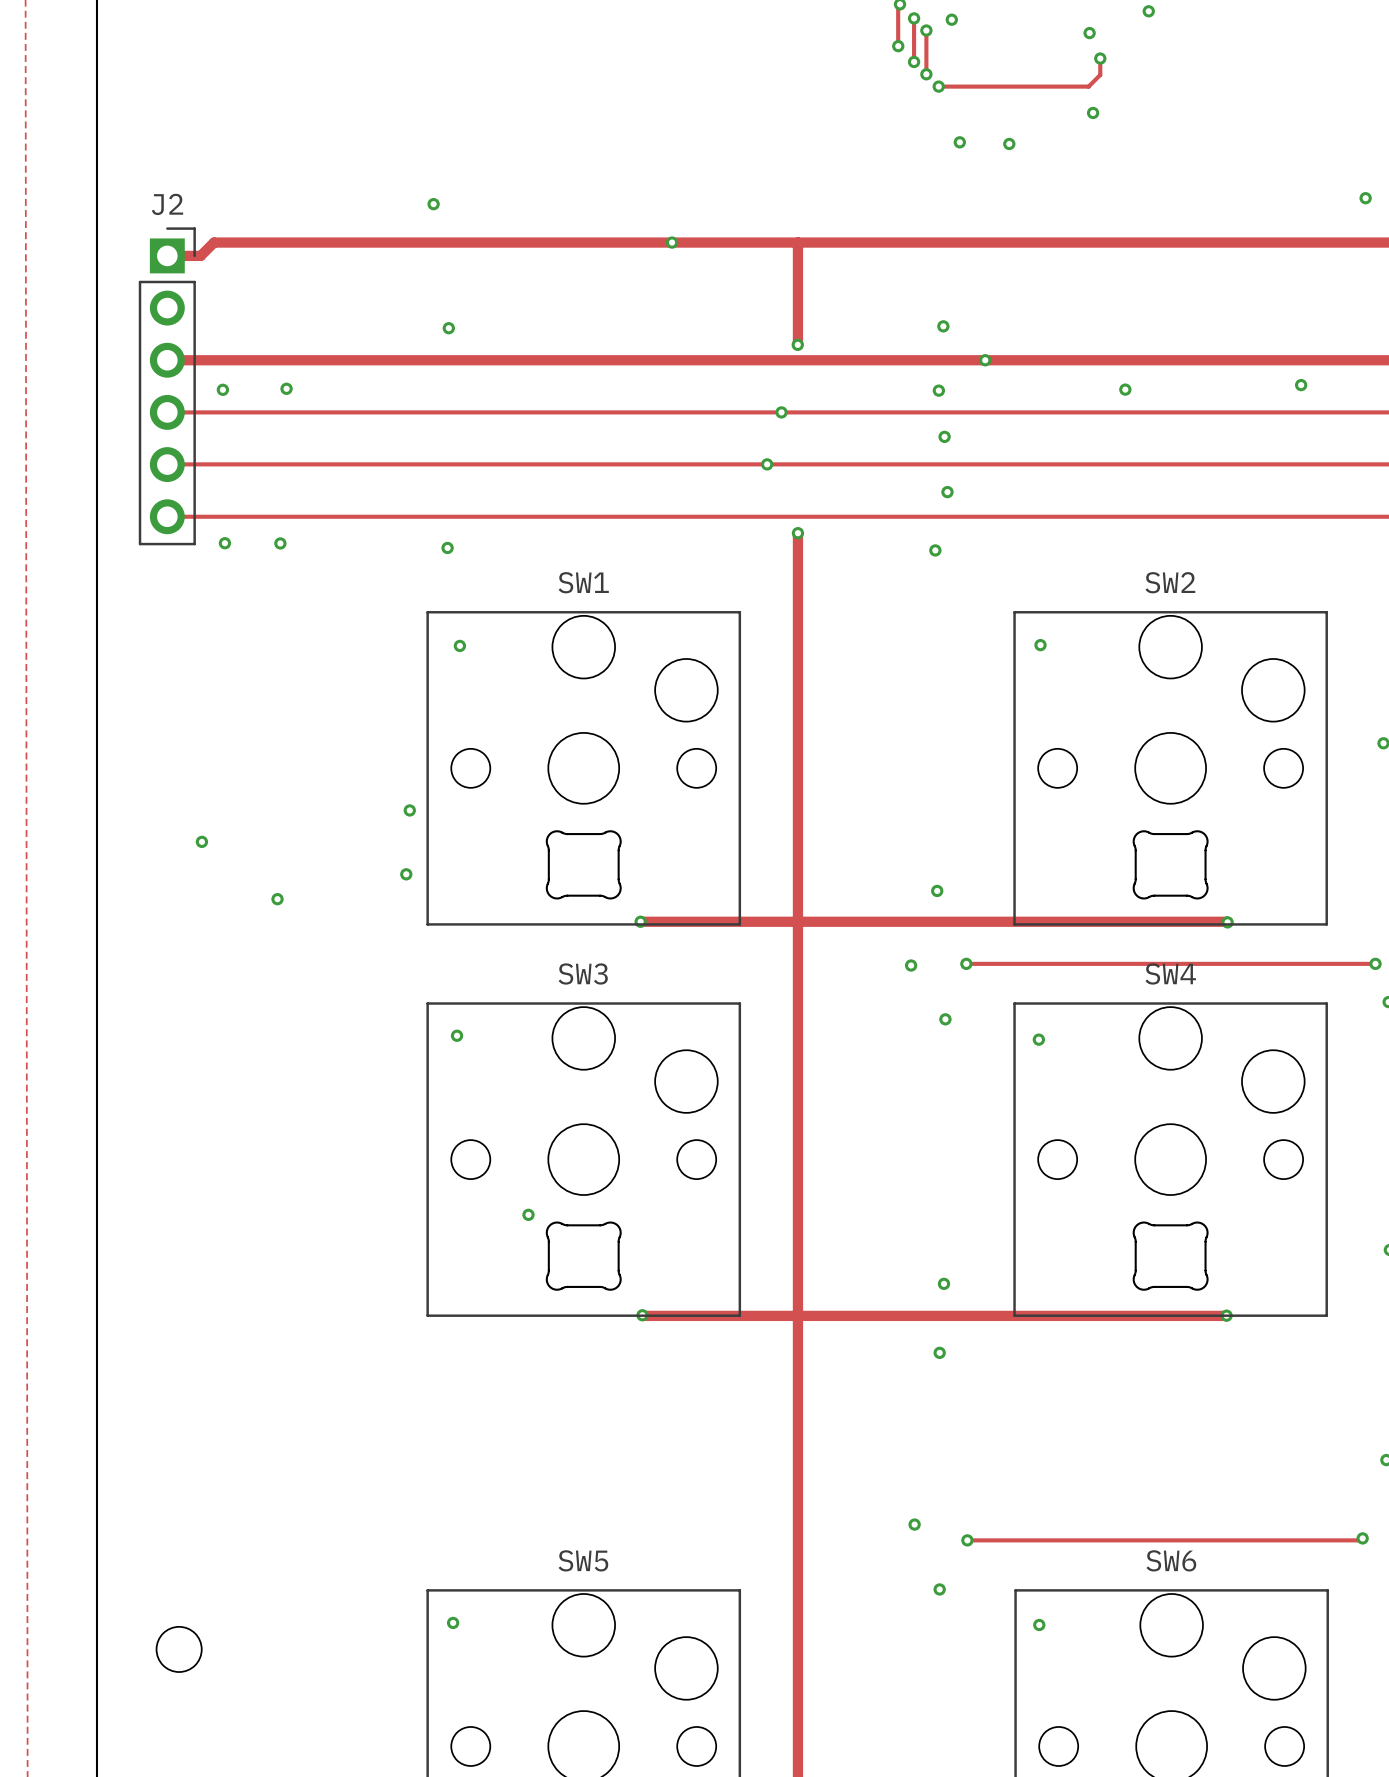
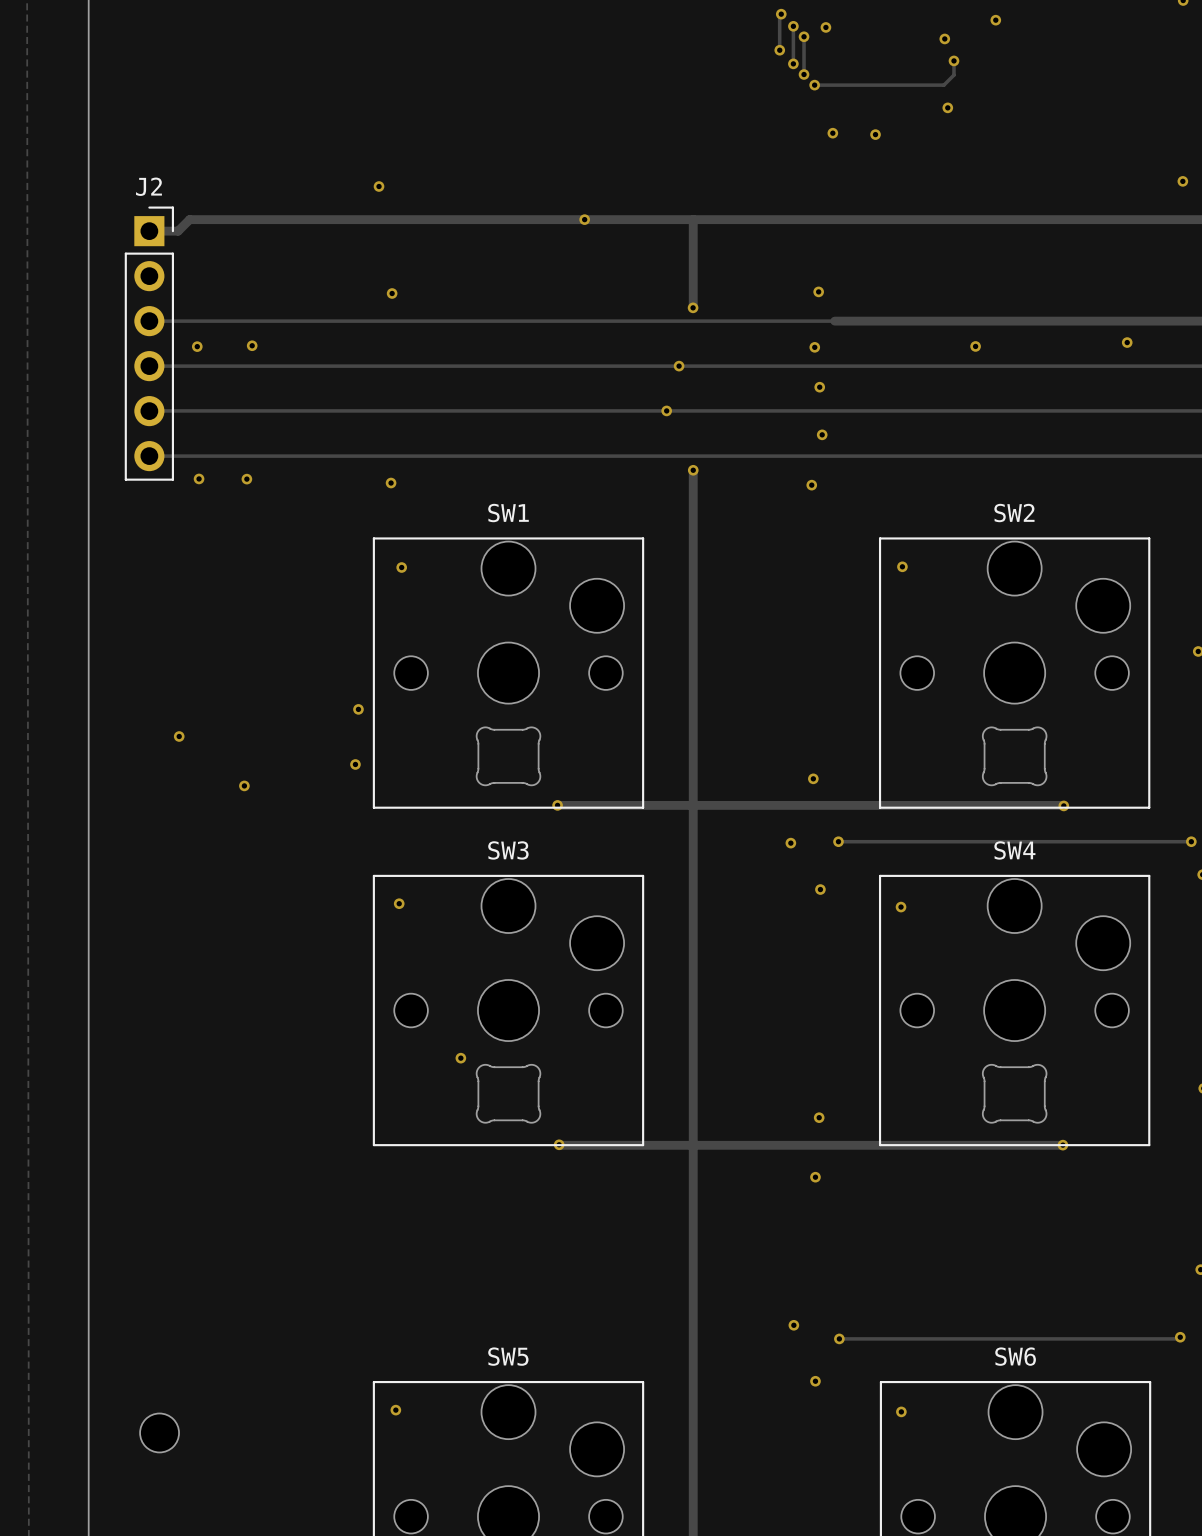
track width: thick (167, 360) (962, 360) -> thin (149, 321) (834, 321)
via: (985, 360) -> none

